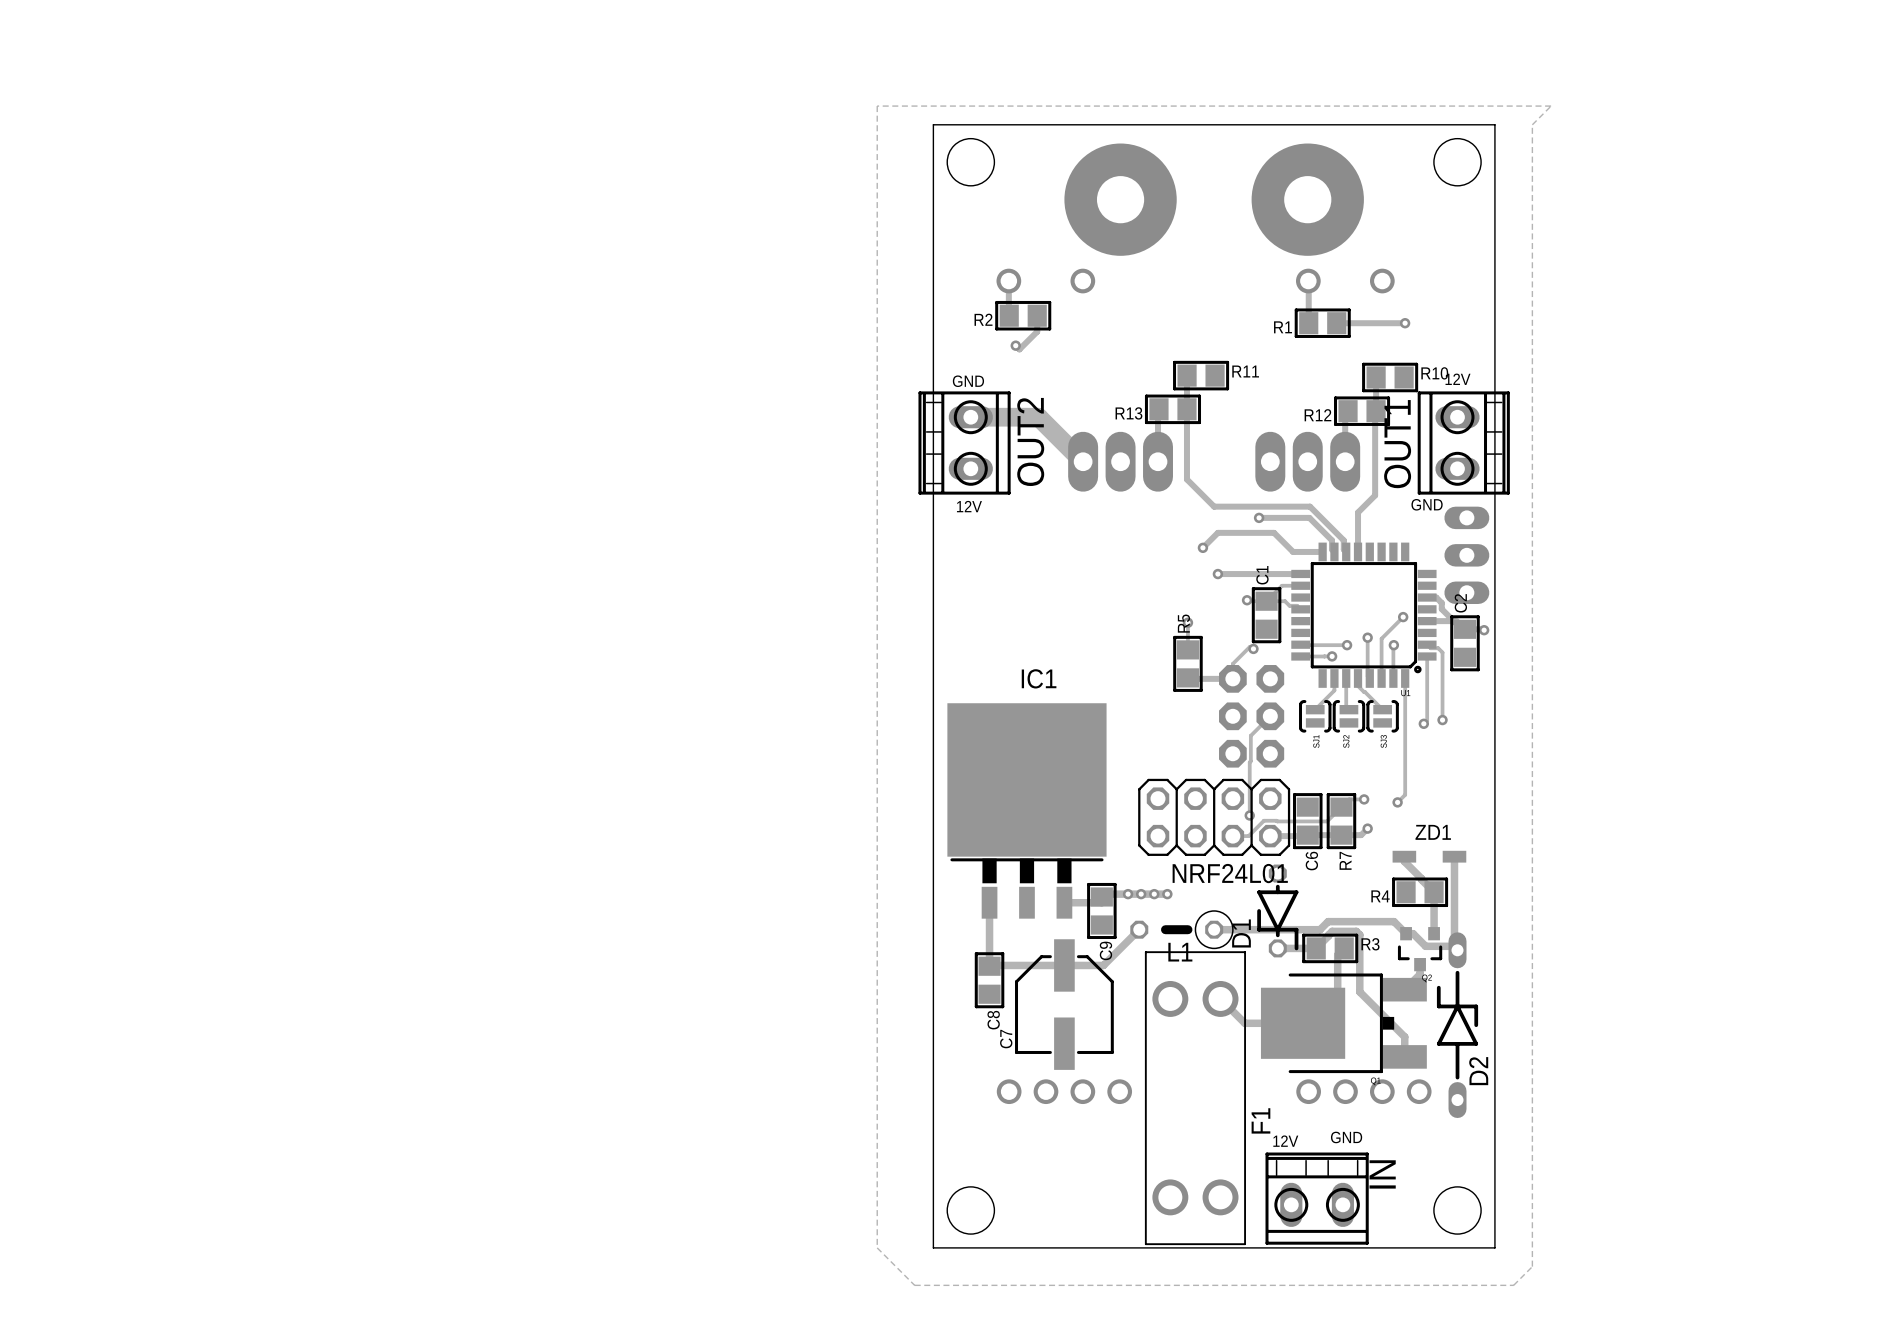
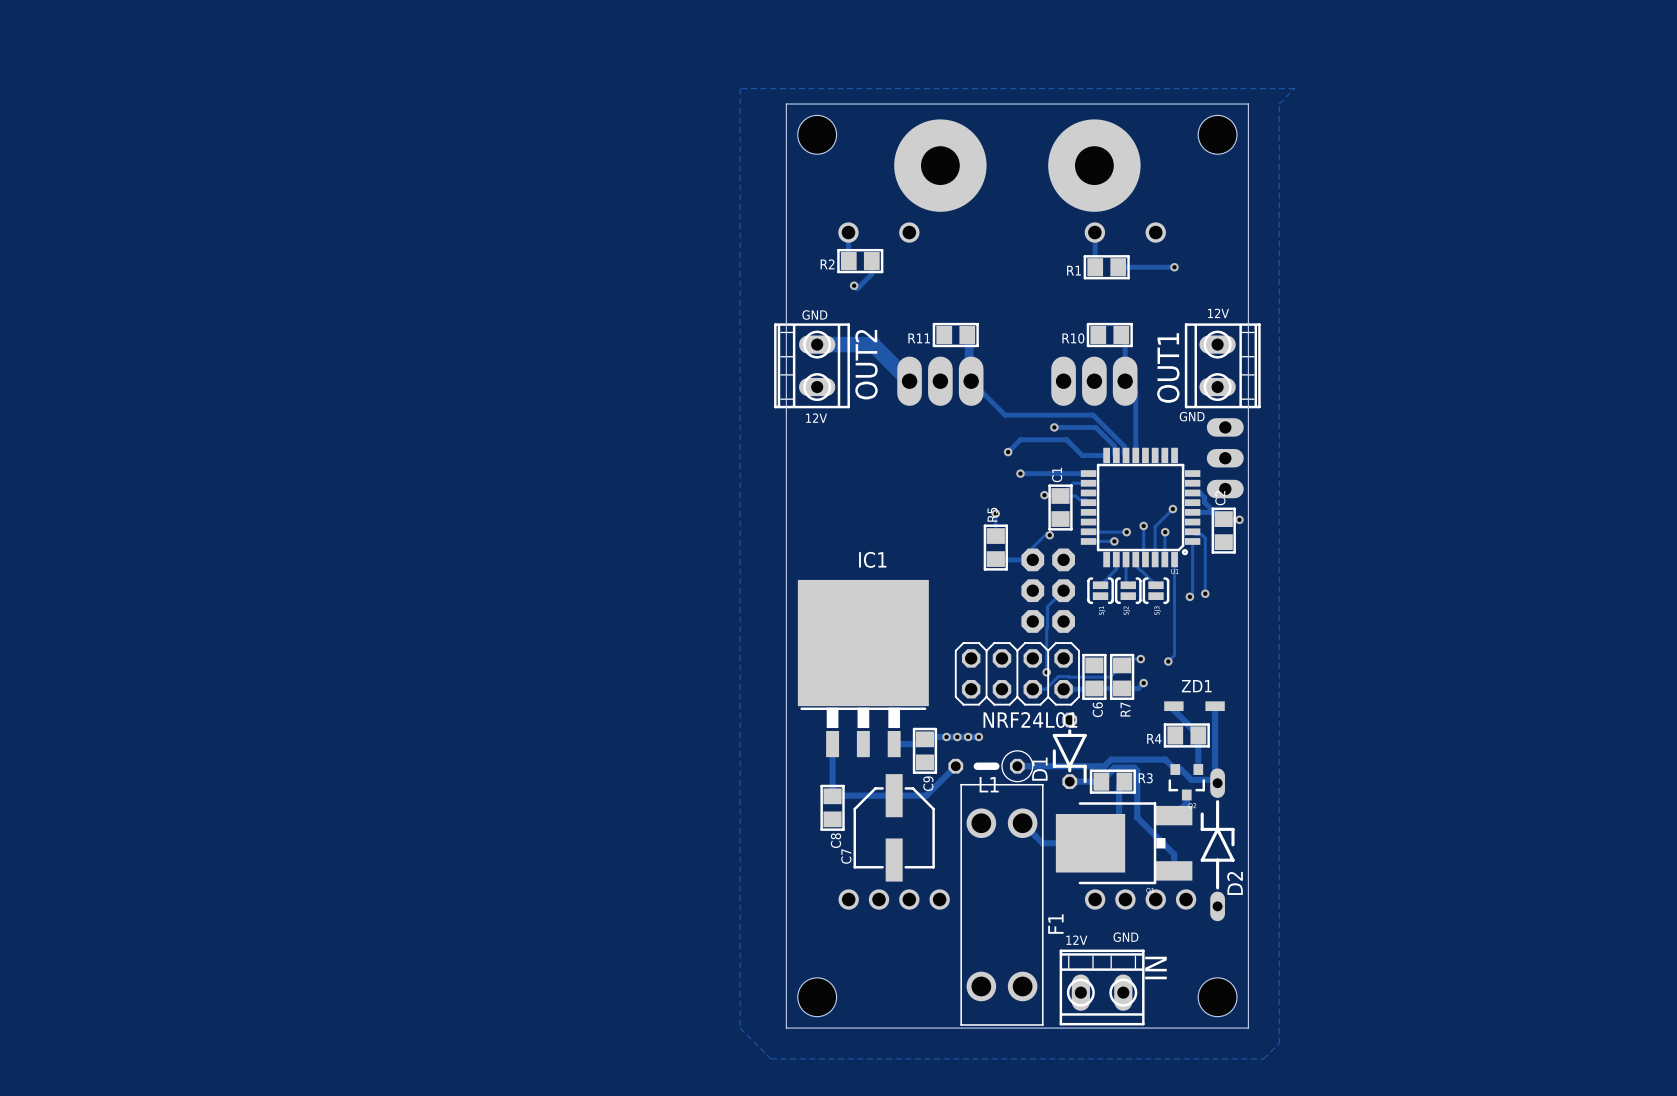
R11 name position: R11 (1245, 371) -> R11 (919, 338)
R10 name position: R10 (1434, 373) -> R10 (1073, 338)
track: (1186, 375) (1186, 479) (1214, 506) (1310, 506) -> (967, 335) (967, 377) (1005, 415) (1093, 415) (1096, 418)
R11 position: (1201, 375) -> (955, 335)
track: (1376, 377) (1375, 495) (1358, 512) -> (1125, 381) (1135, 391) (1135, 423)
R10 position: (1390, 377) -> (1109, 335)
R13: (1172, 409) -> none
R12: (1362, 411) -> none

